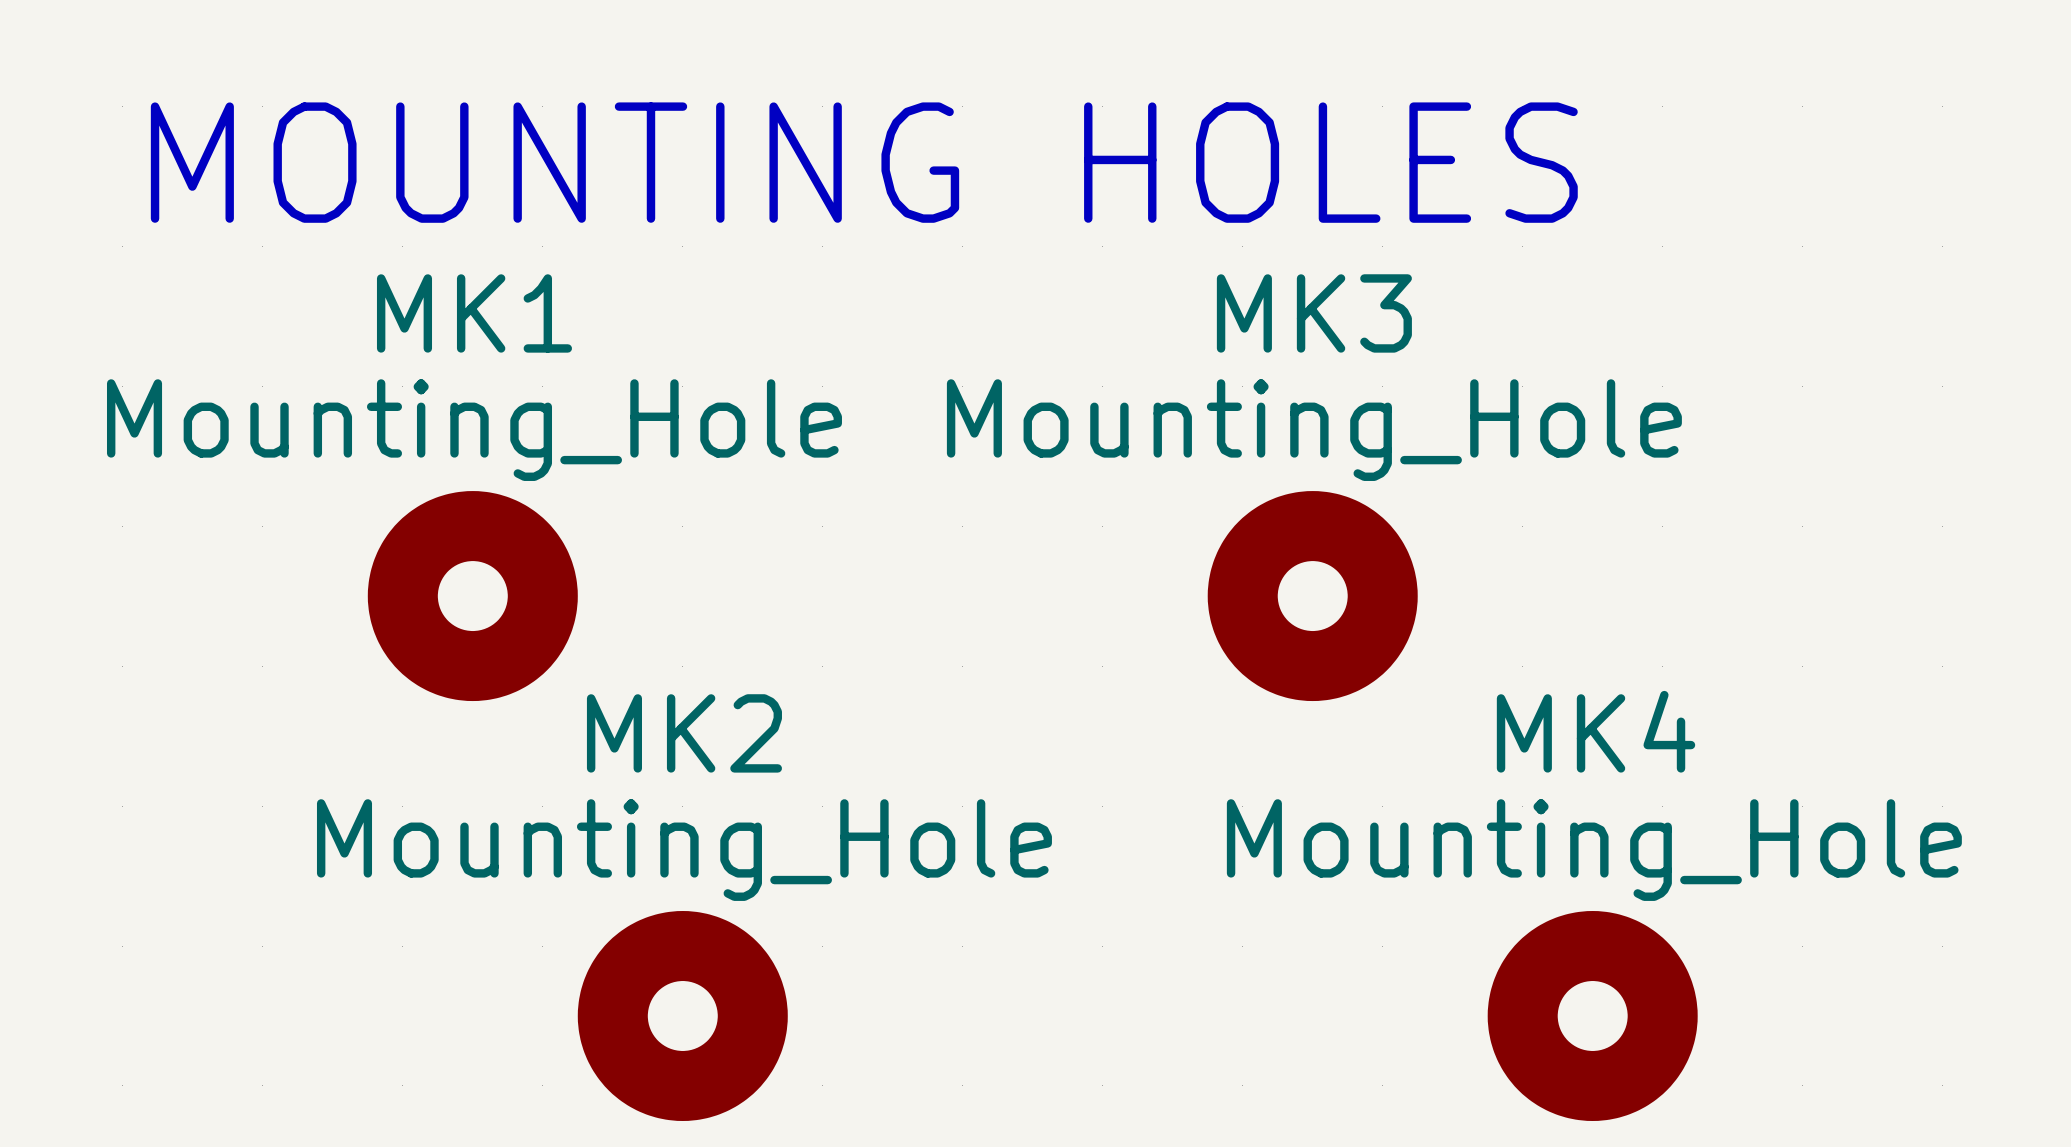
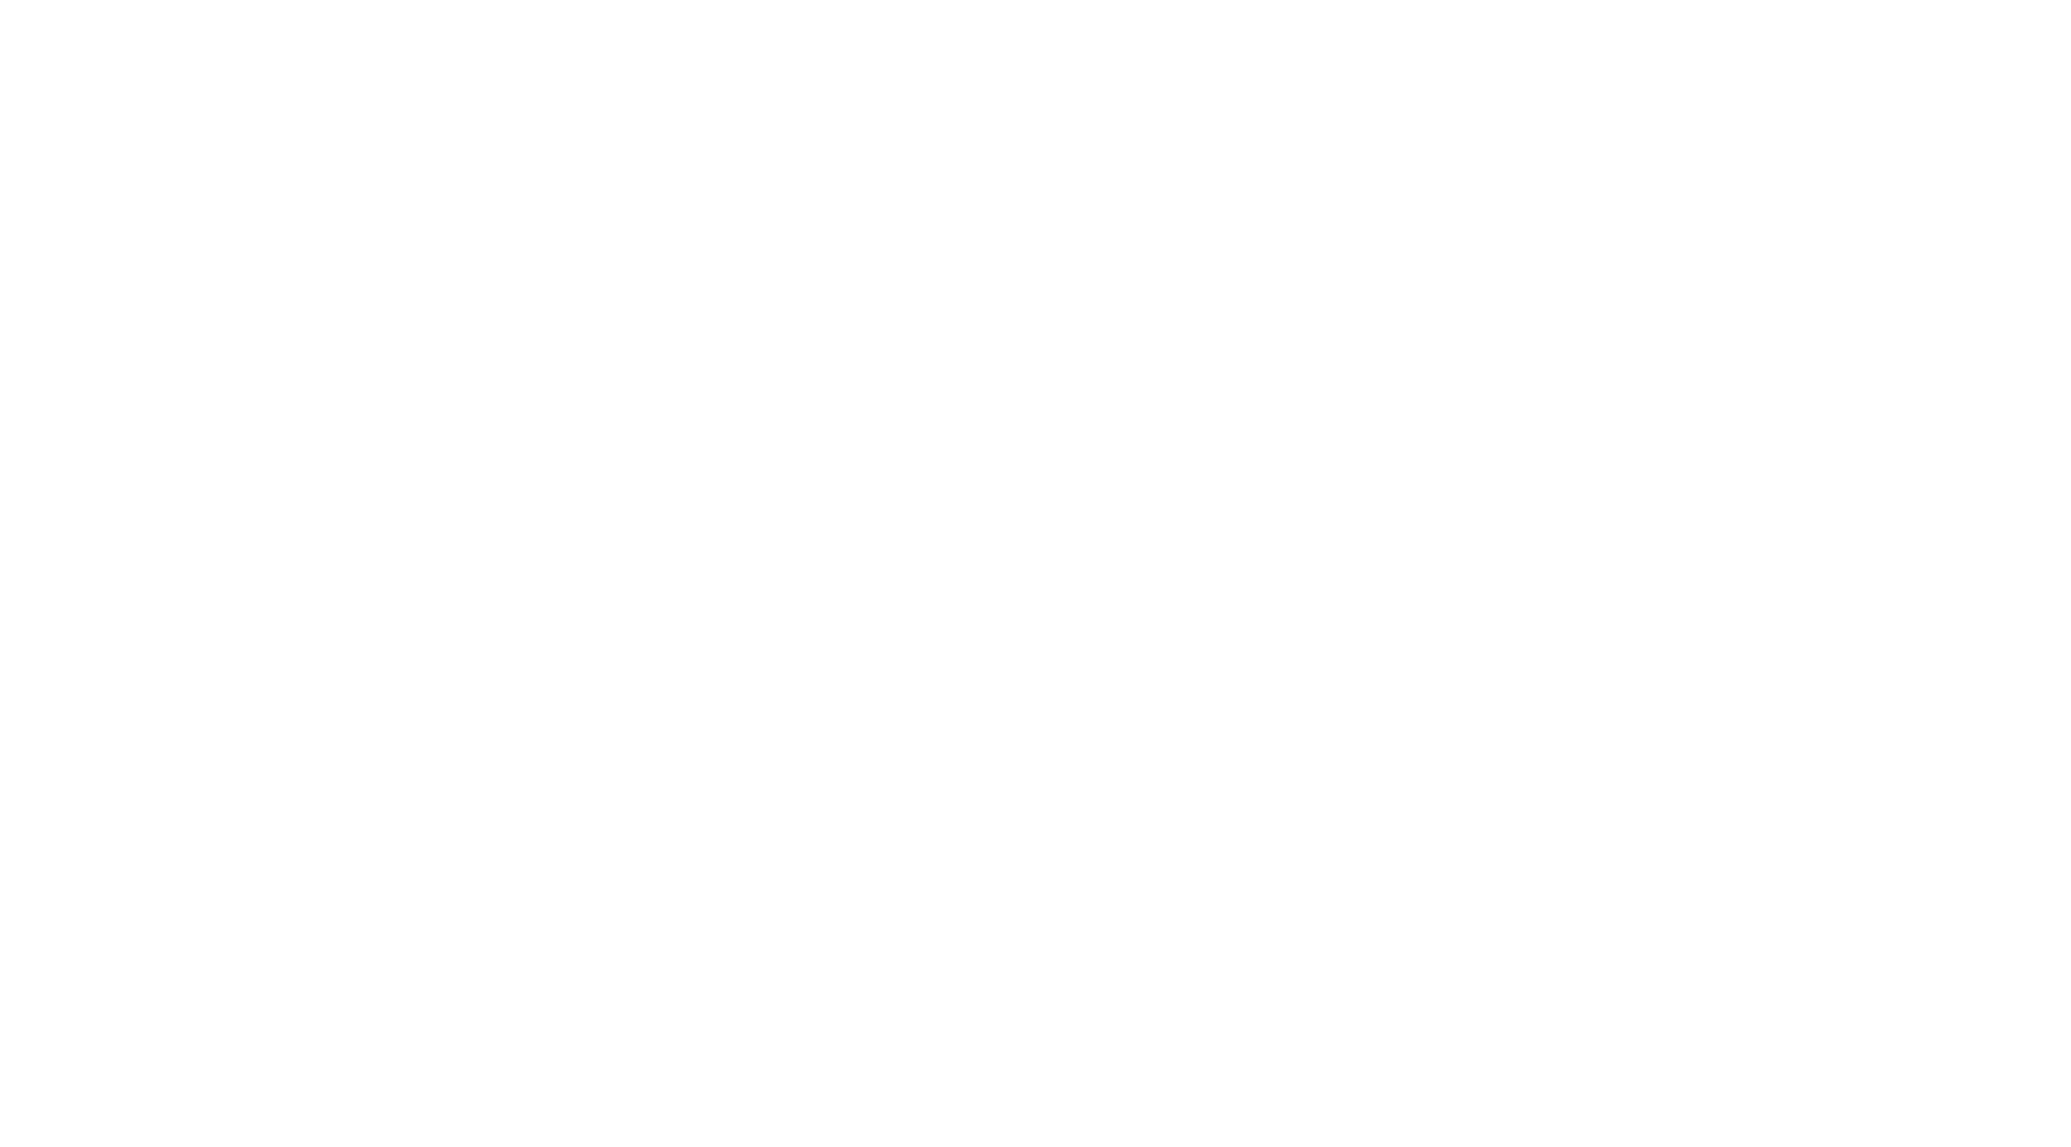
text: MOUNTING HOLES (864, 162) -> none
MK1: Mounting_Hole (472, 596) -> none
MK3: Mounting_Hole (1312, 596) -> none
MK2: Mounting_Hole (682, 1016) -> none
MK4: Mounting_Hole (1592, 1016) -> none

